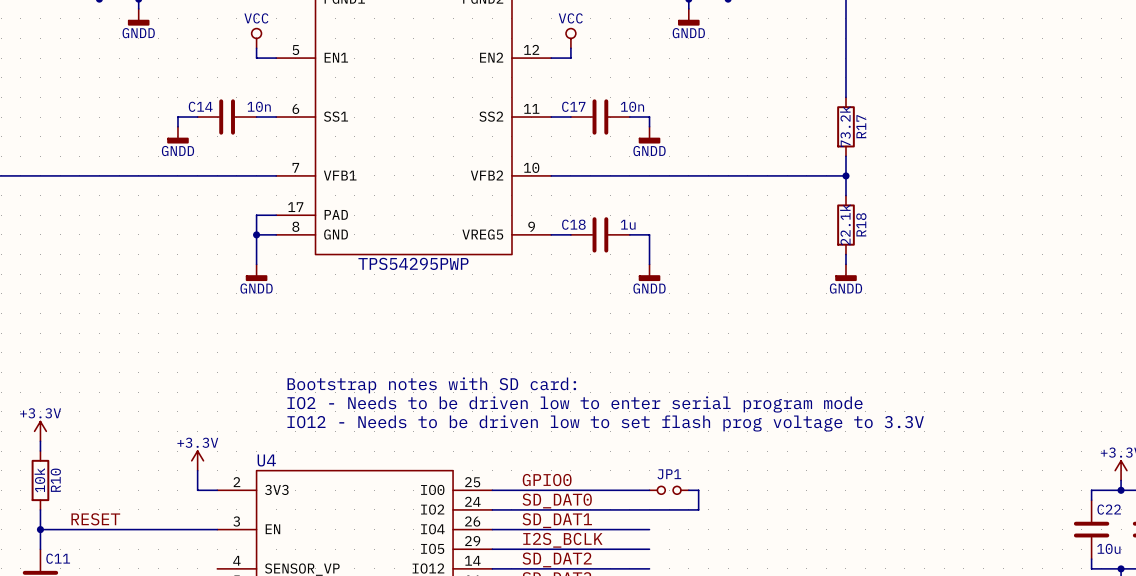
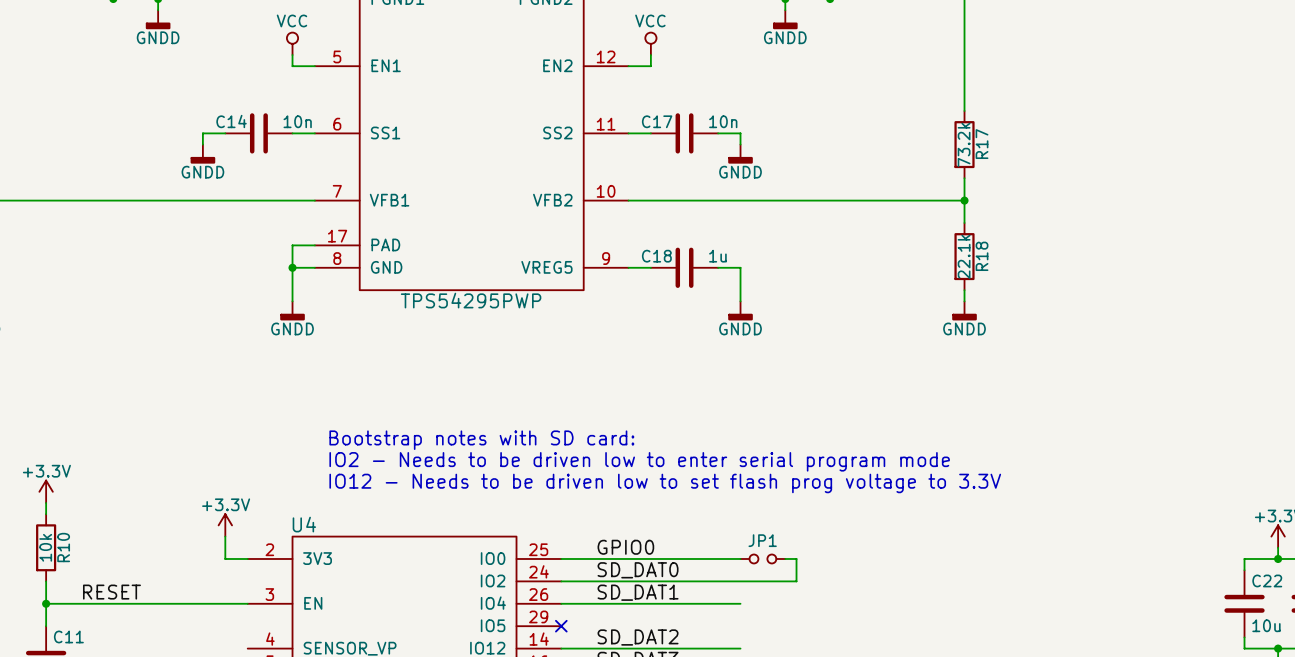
label: I2S_BCLK (562, 540) -> none
wire: (492, 549) (649, 549) -> none
no-connect mark: none -> (561, 626)

